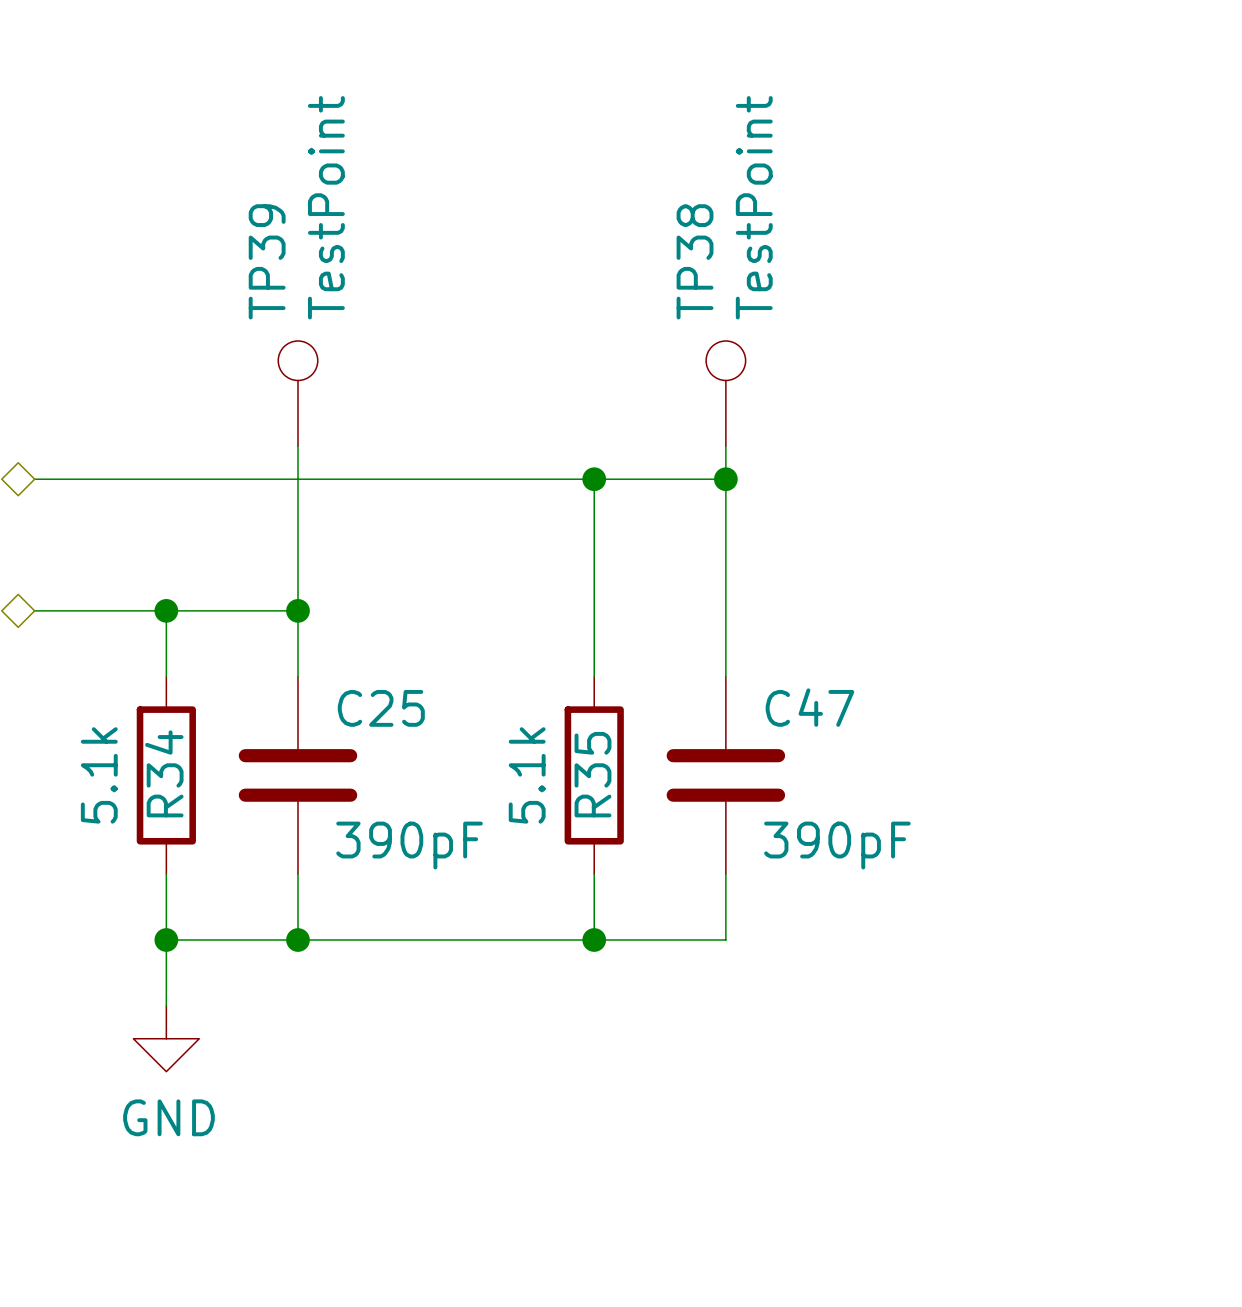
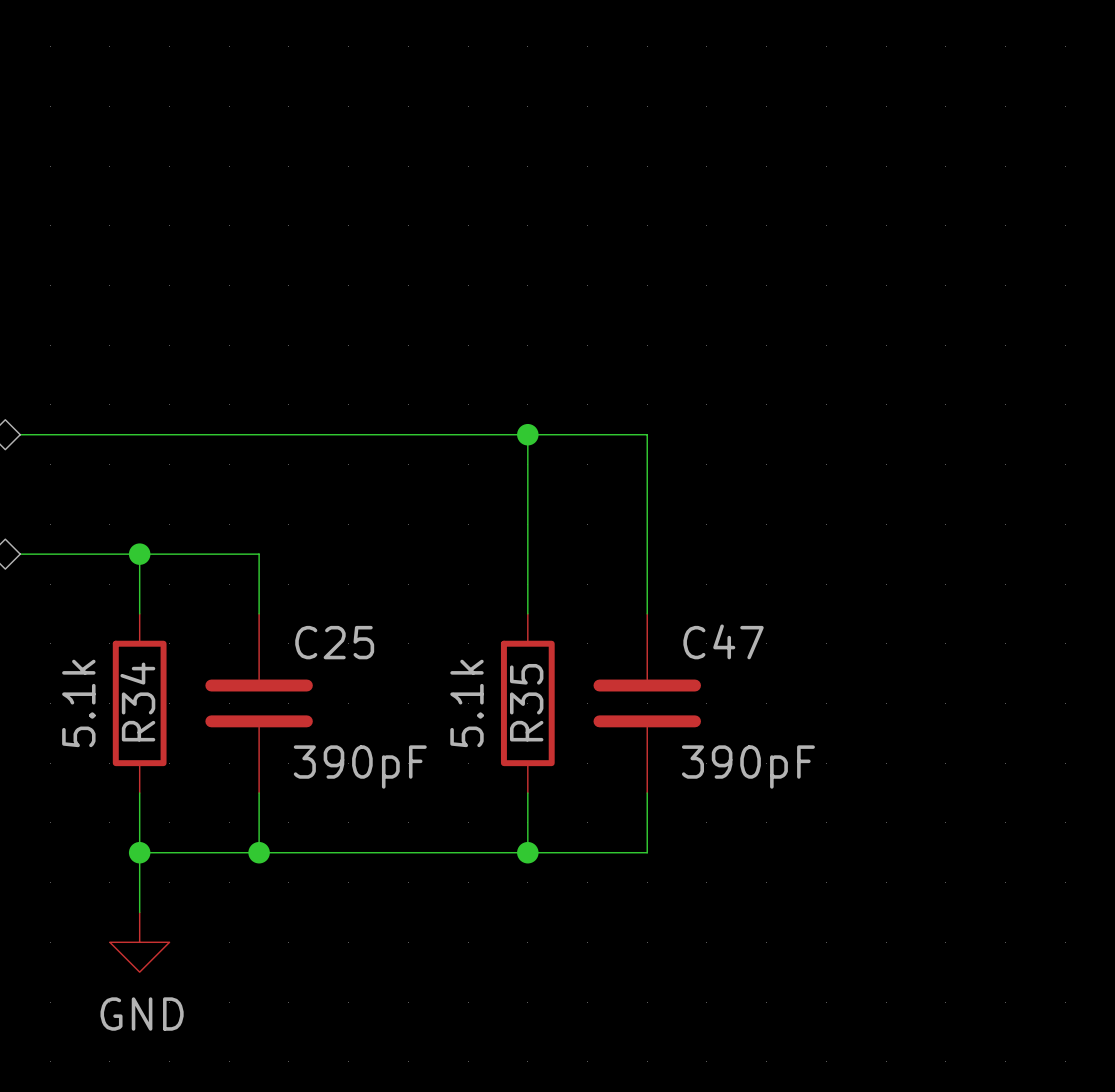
TP39: TestPoint (298, 393) -> none
TP38: TestPoint (725, 393) -> none
wire: (298, 446) (298, 610) -> none
wire: (725, 446) (725, 479) -> none
junction: (725, 479) -> none
junction: (298, 610) -> none

